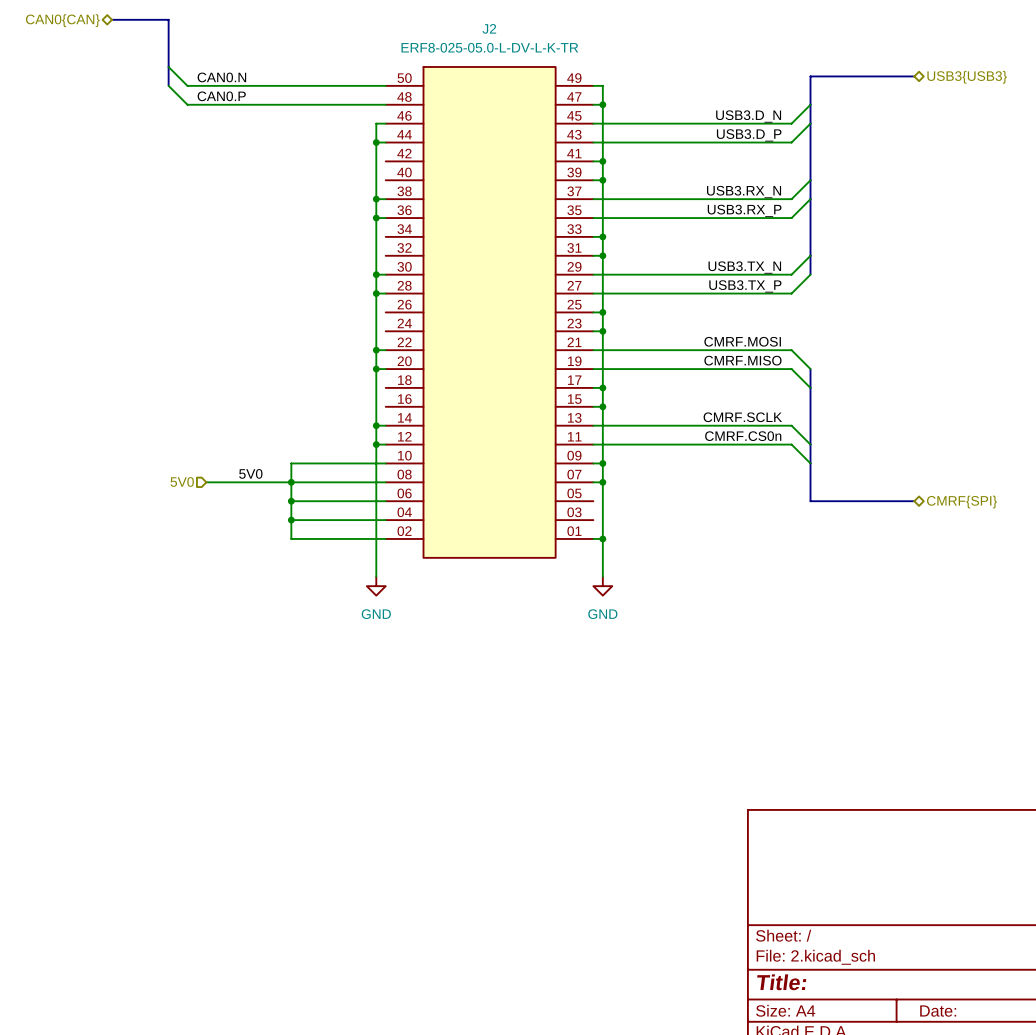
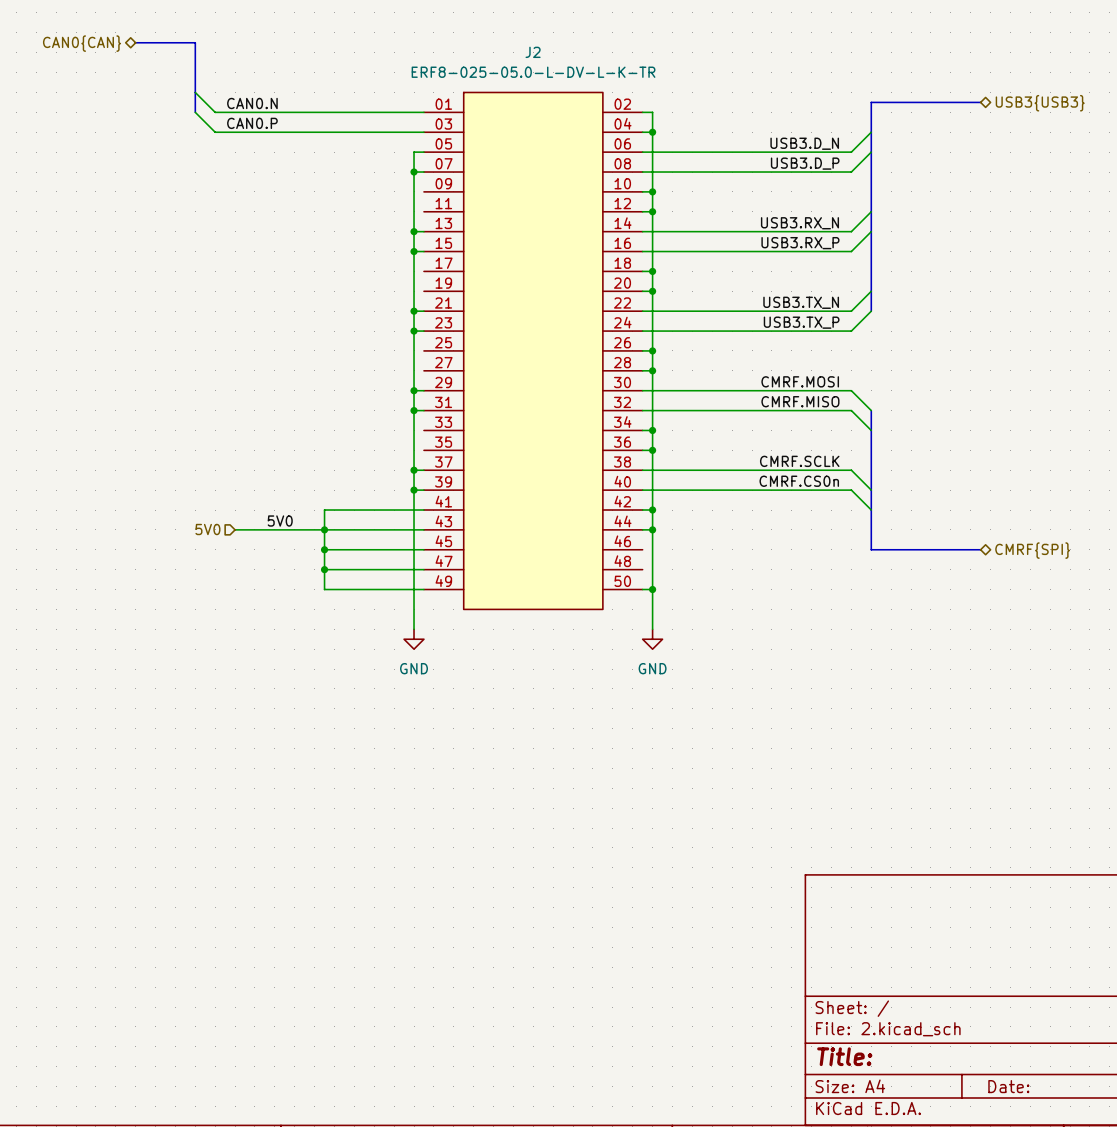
J2 rotation: 0° (489, 312) -> 180° (533, 350)

